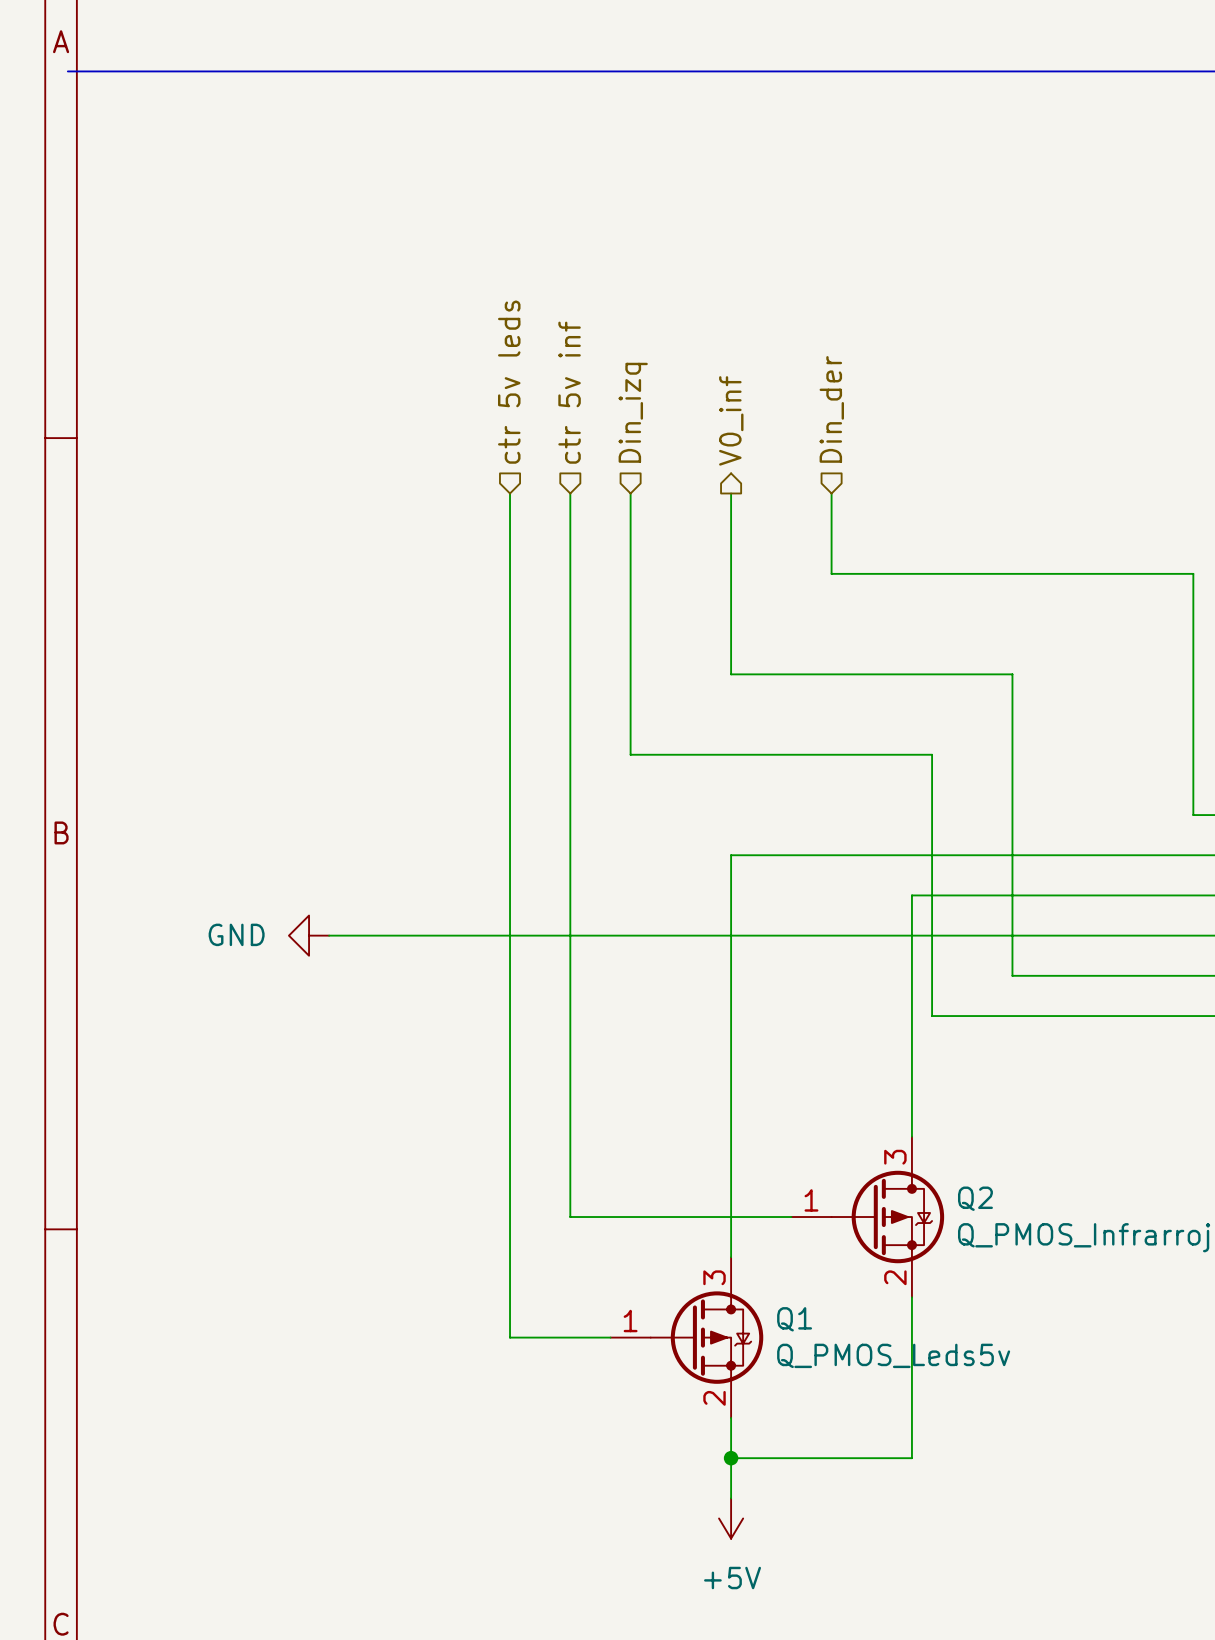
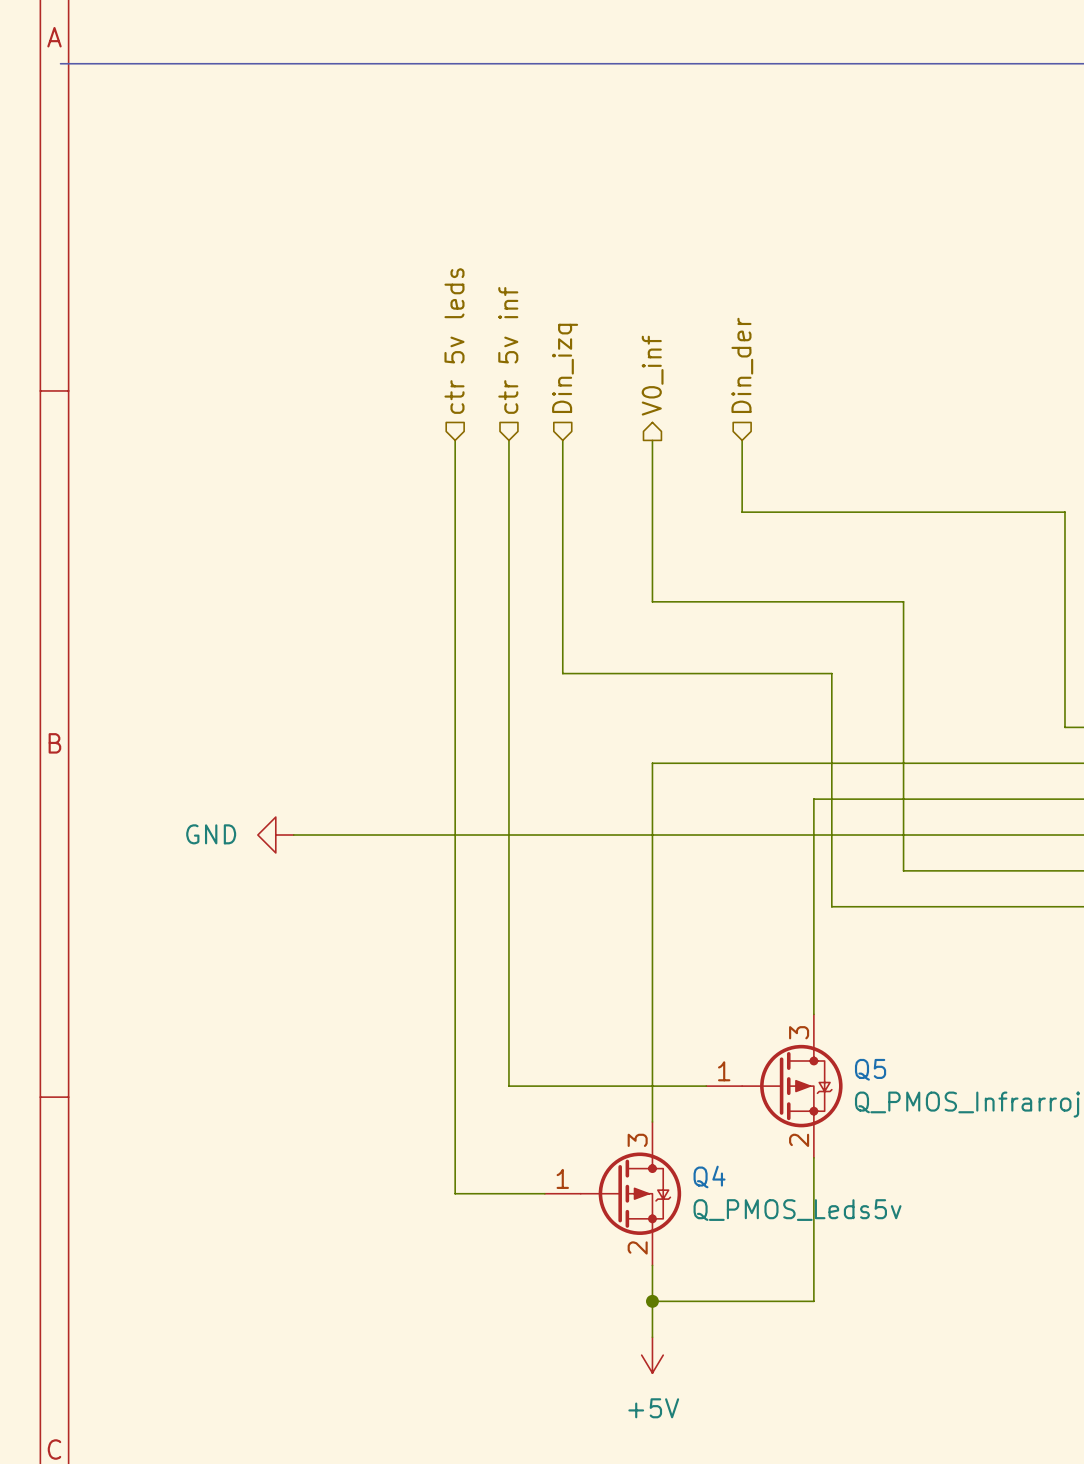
Q2 name: Q2 (975, 1198) -> Q5 (870, 1069)
Q1 name: Q1 (794, 1319) -> Q4 (709, 1176)

